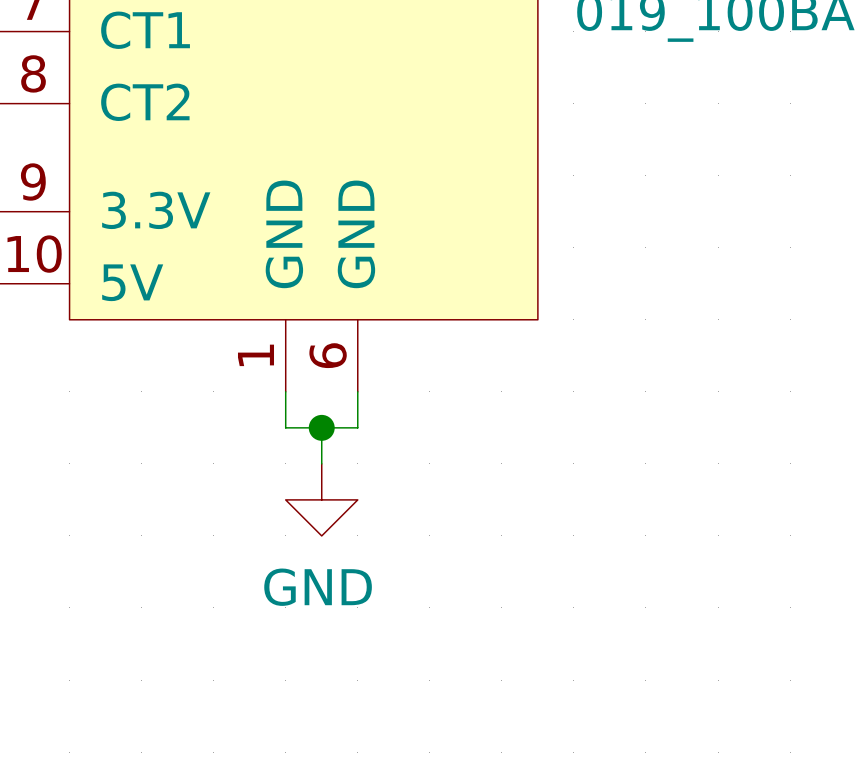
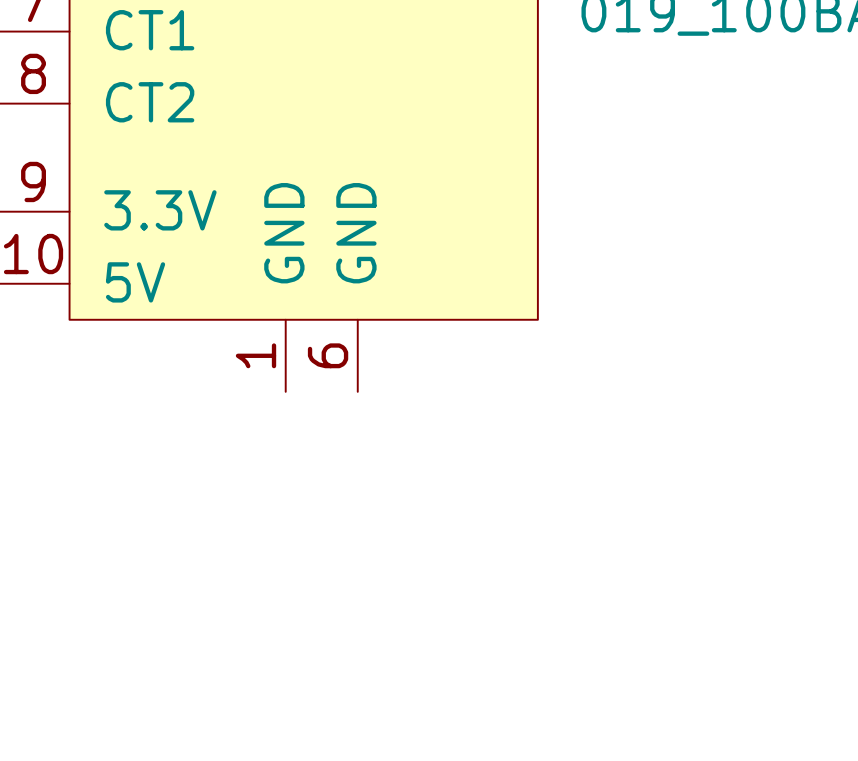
wire: (285, 391) (285, 427) (357, 427) (357, 391) -> none
wire: (321, 427) (321, 463) -> none
junction: (321, 427) -> none
power symbol: GND (321, 499) -> none

